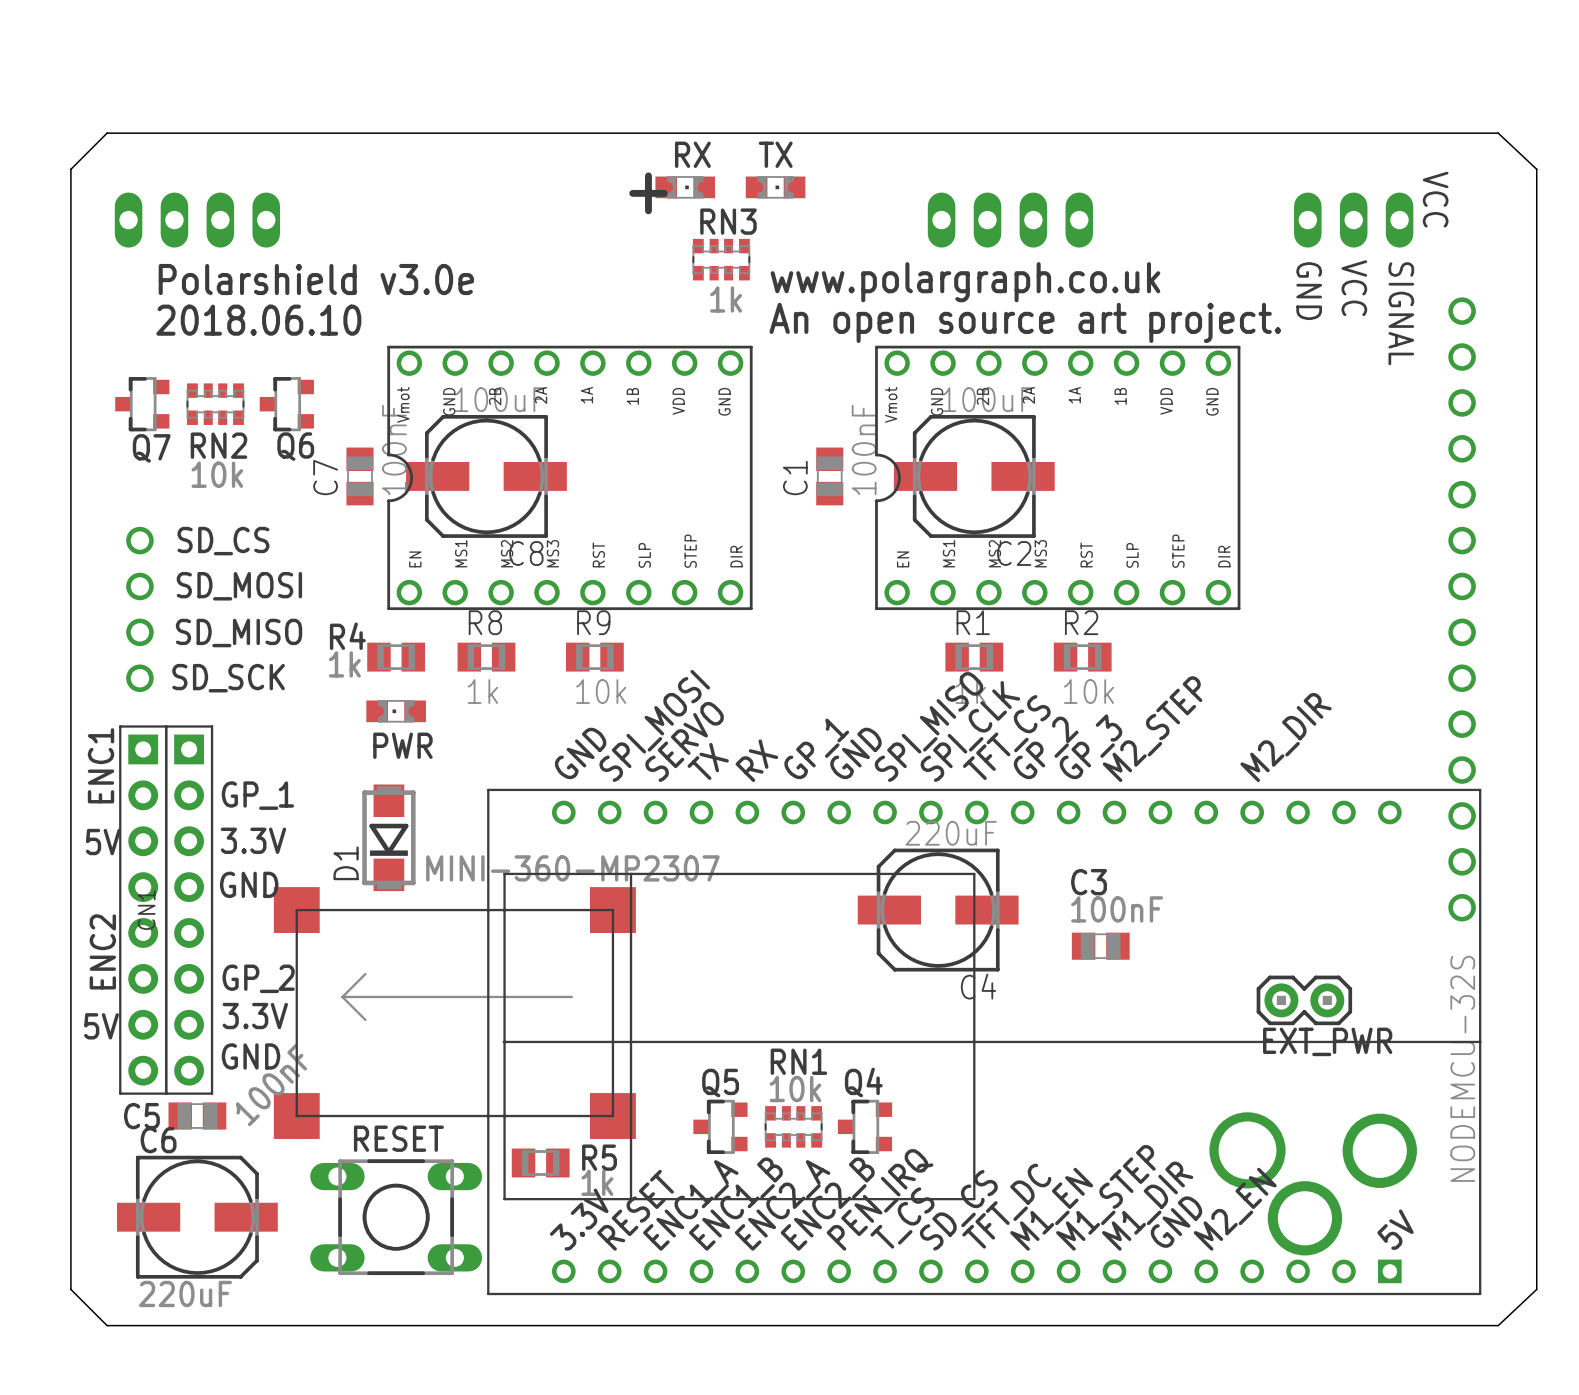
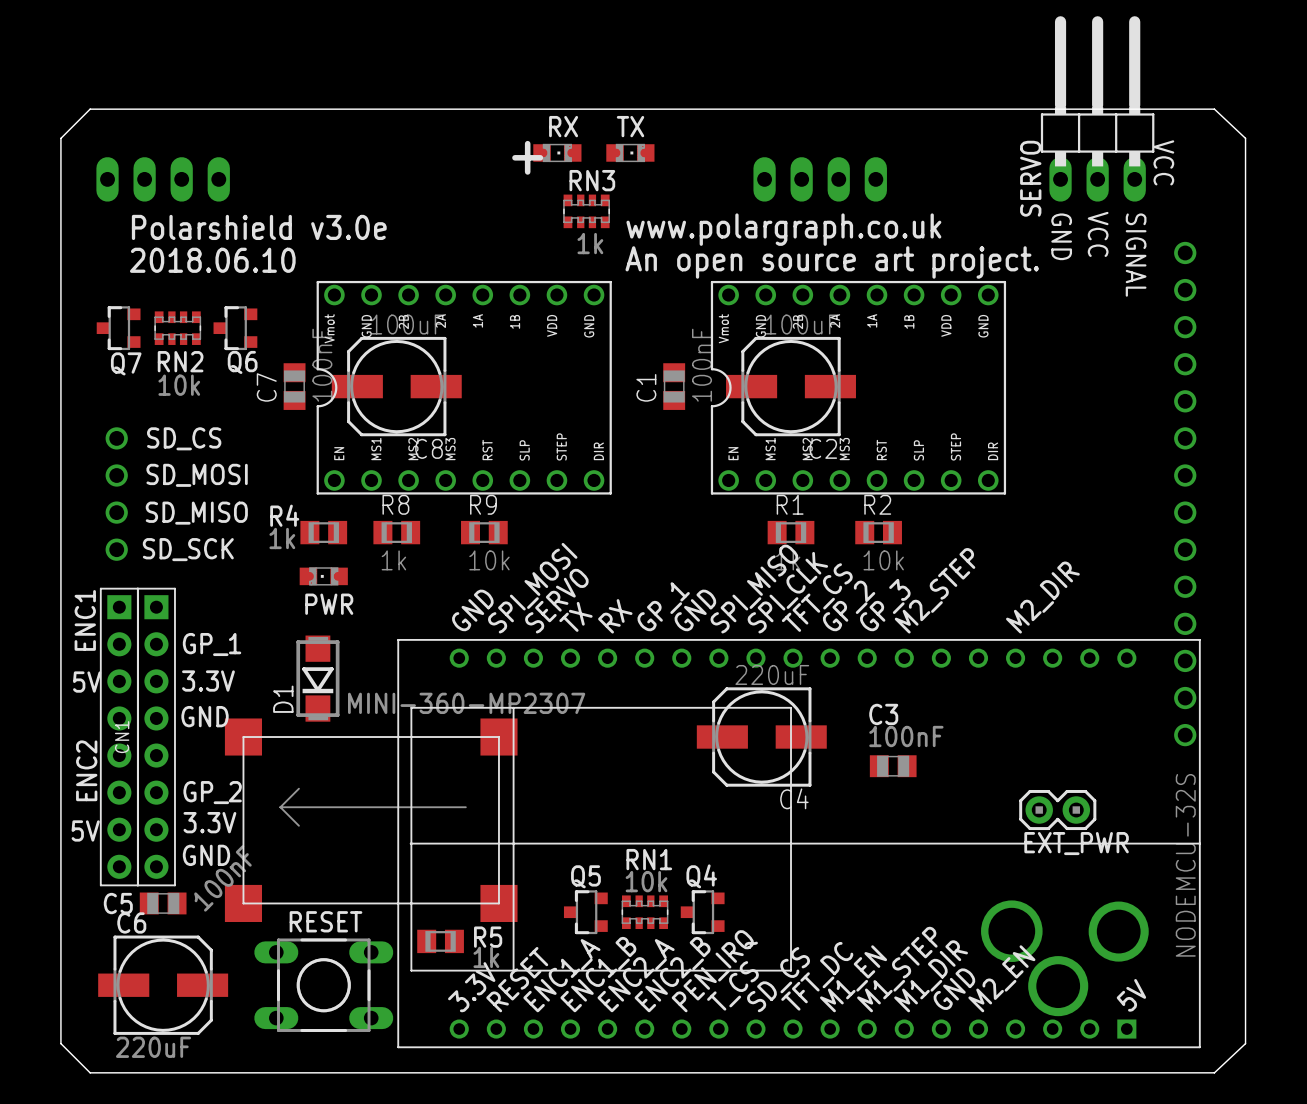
SERVO side: bottom (1353, 220) -> top (1097, 108)

